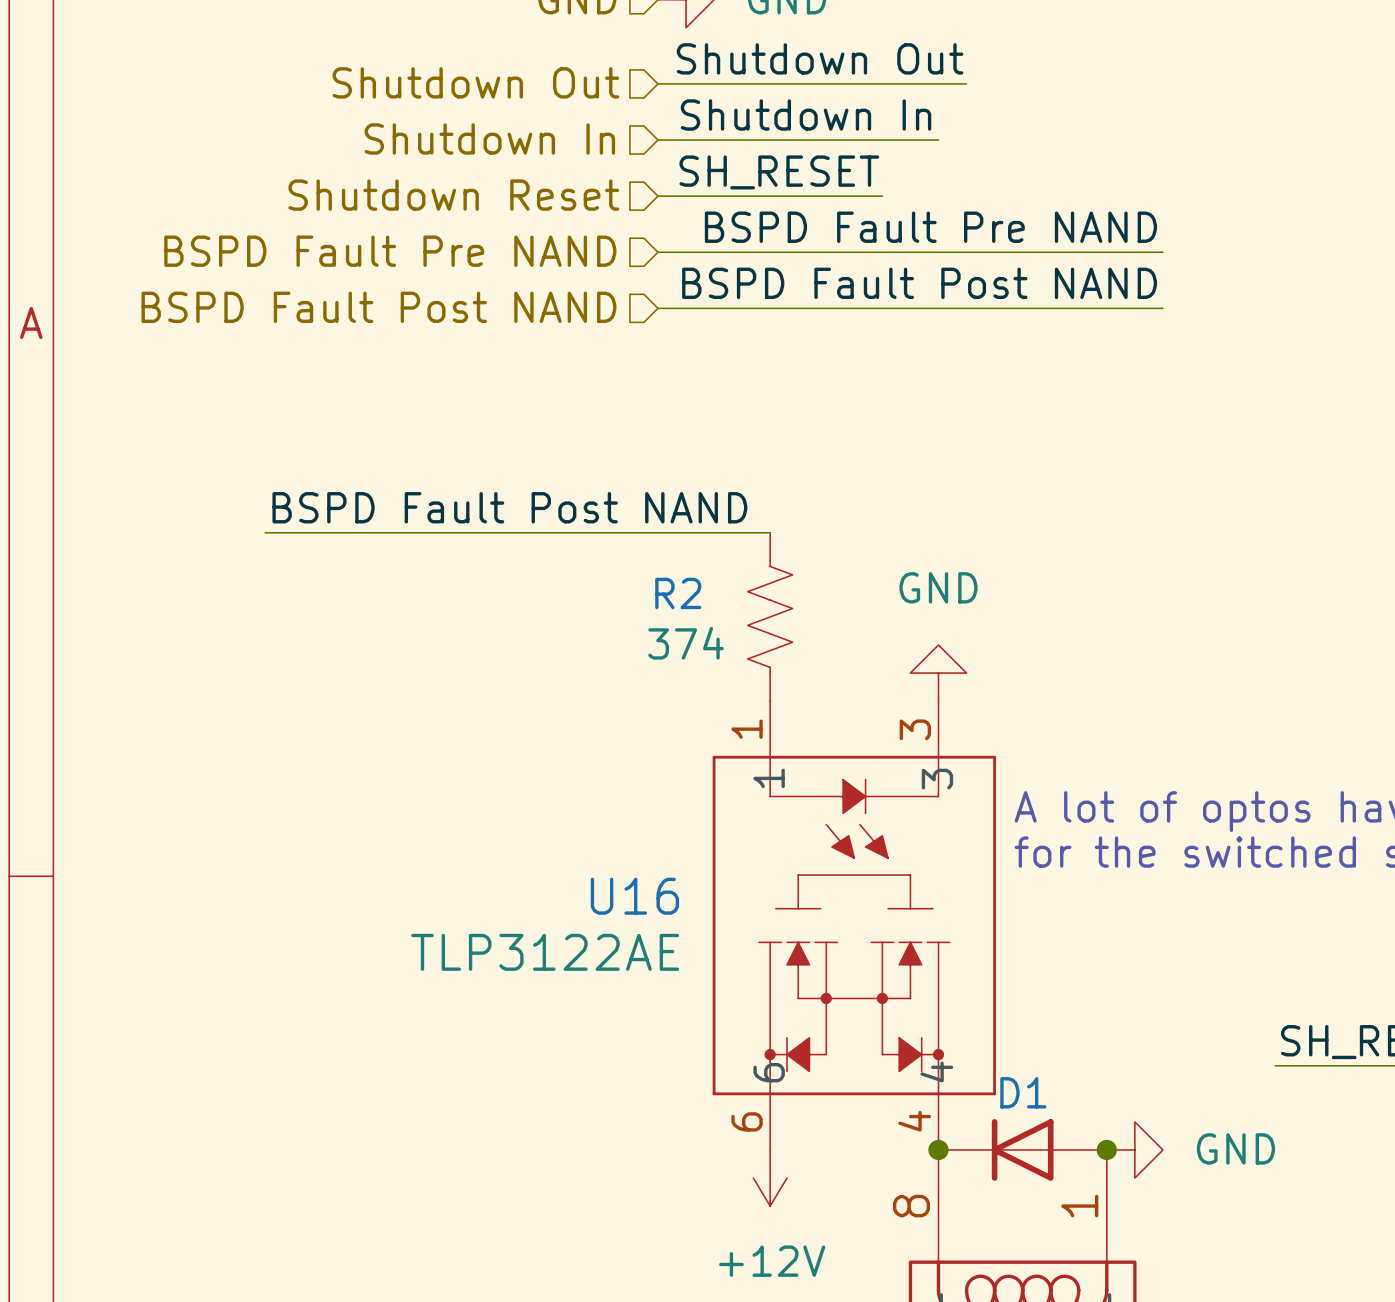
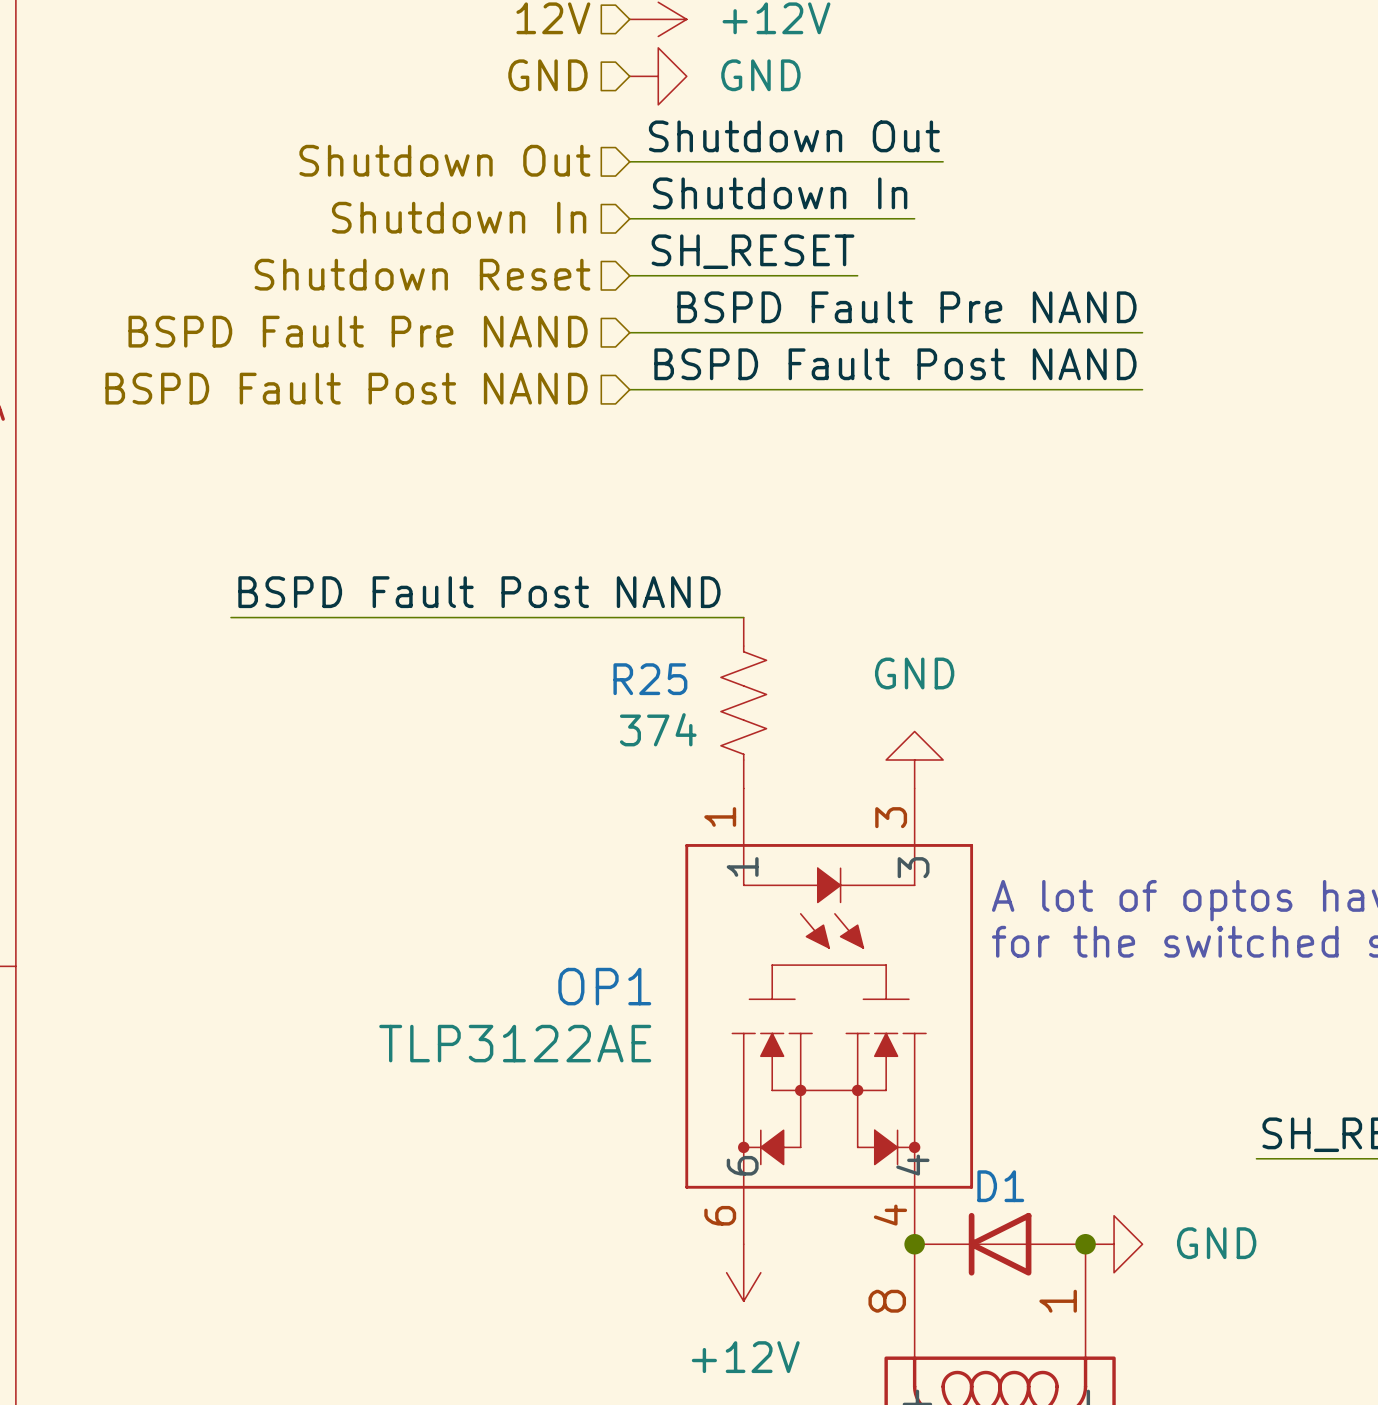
R2 name: R2 (678, 593) -> R25 (650, 679)
U16 name: U16 (634, 896) -> OP1 (604, 986)

